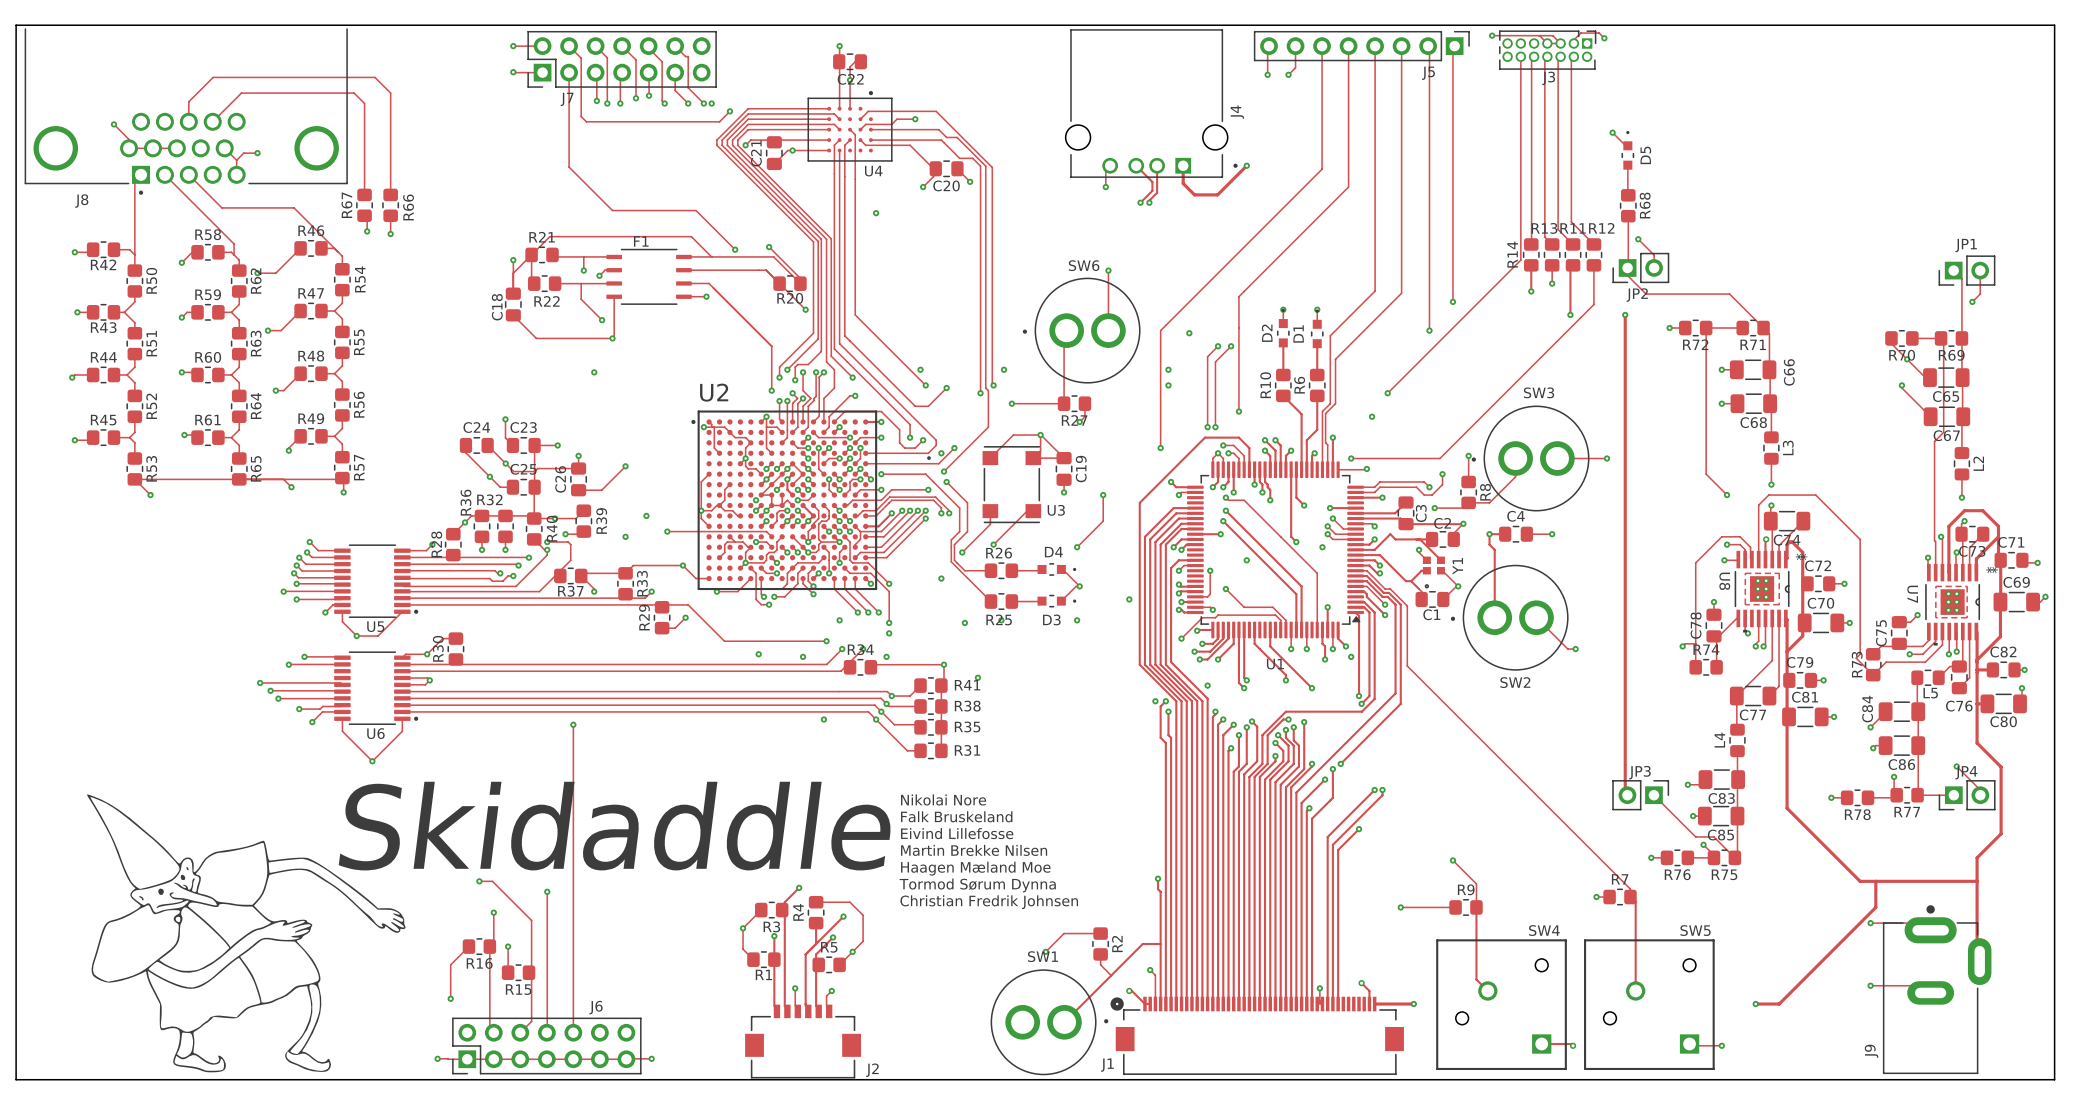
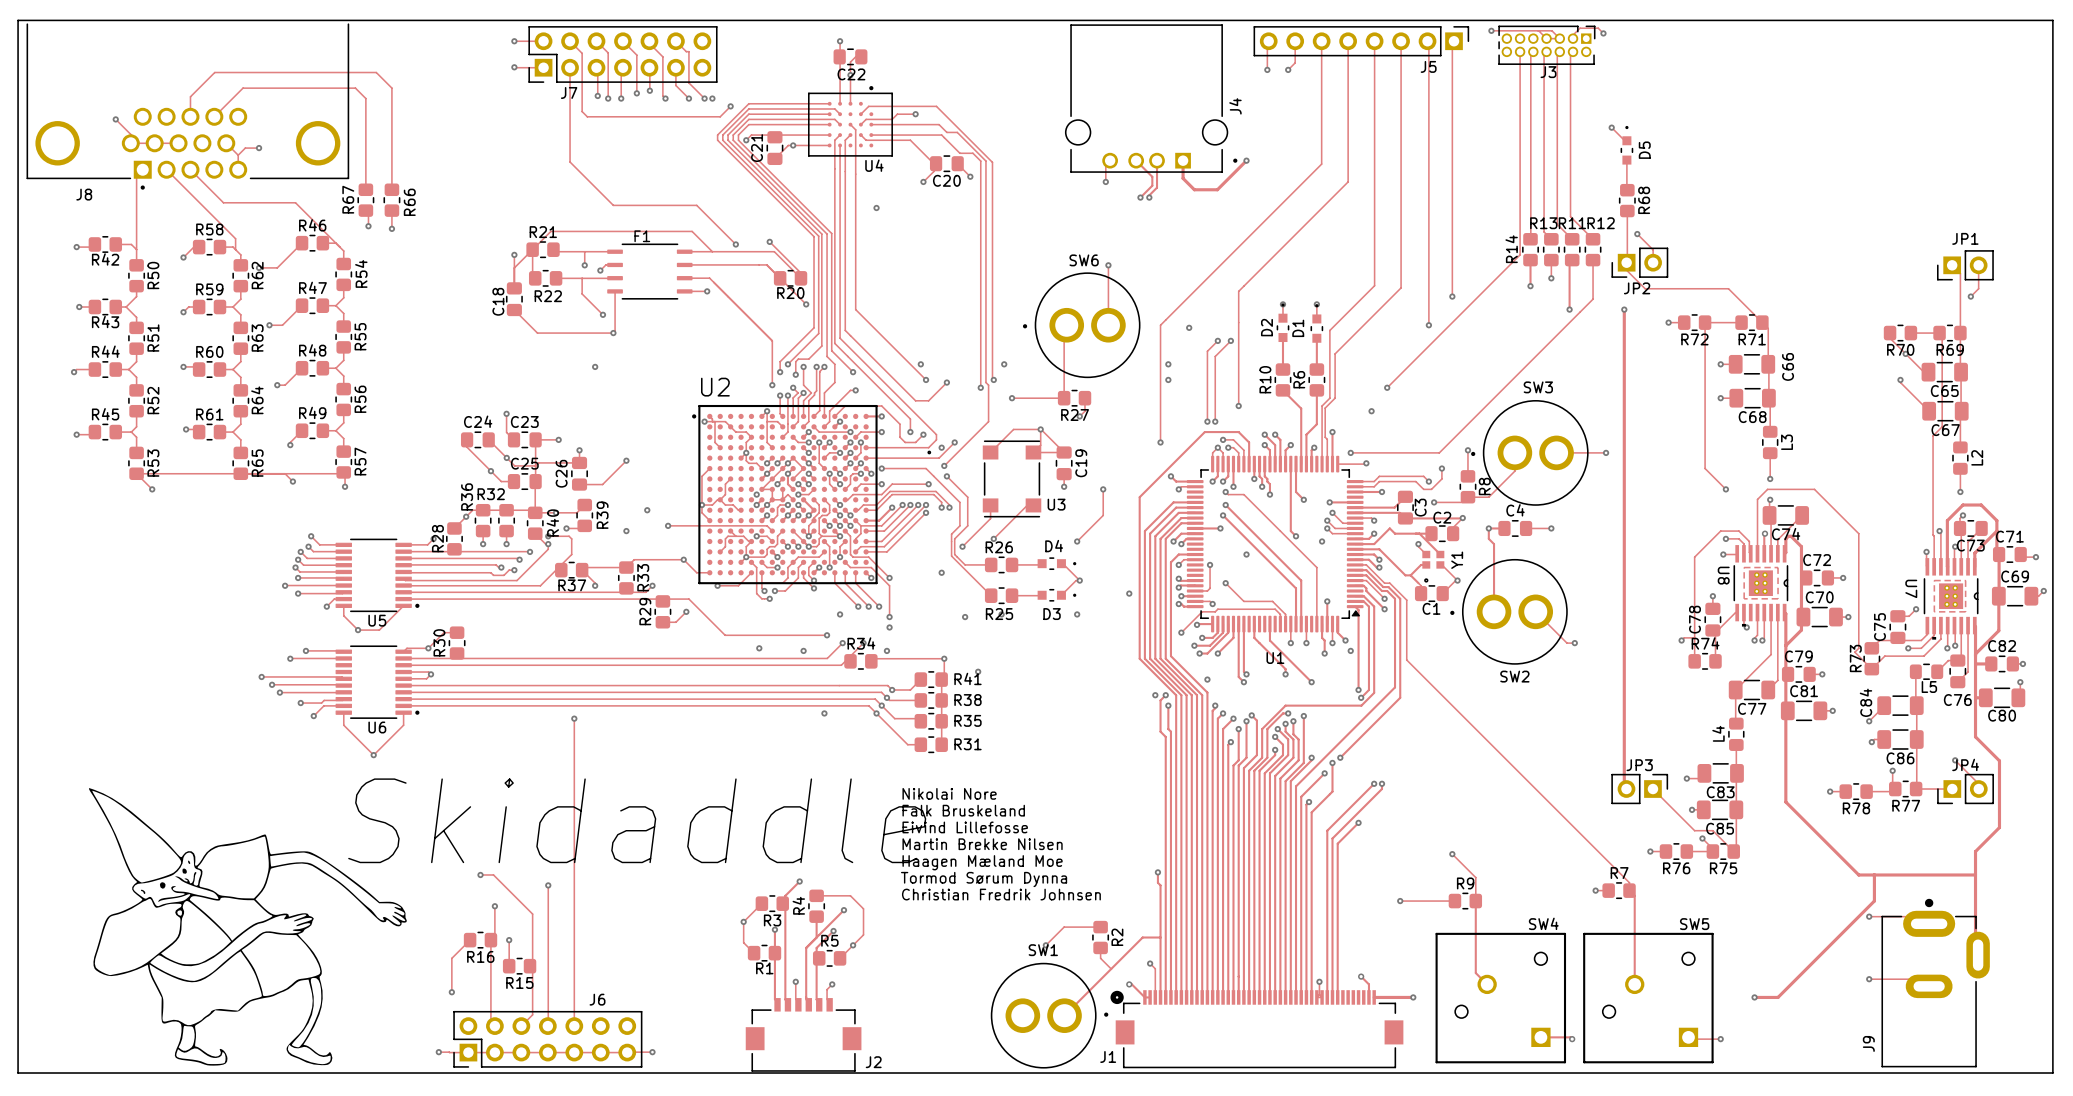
U8 footprint: [1734, 550, 1790, 633] -> [1733, 545, 1789, 627]
U7 footprint: [1925, 563, 1981, 646] -> [1923, 558, 1979, 640]

